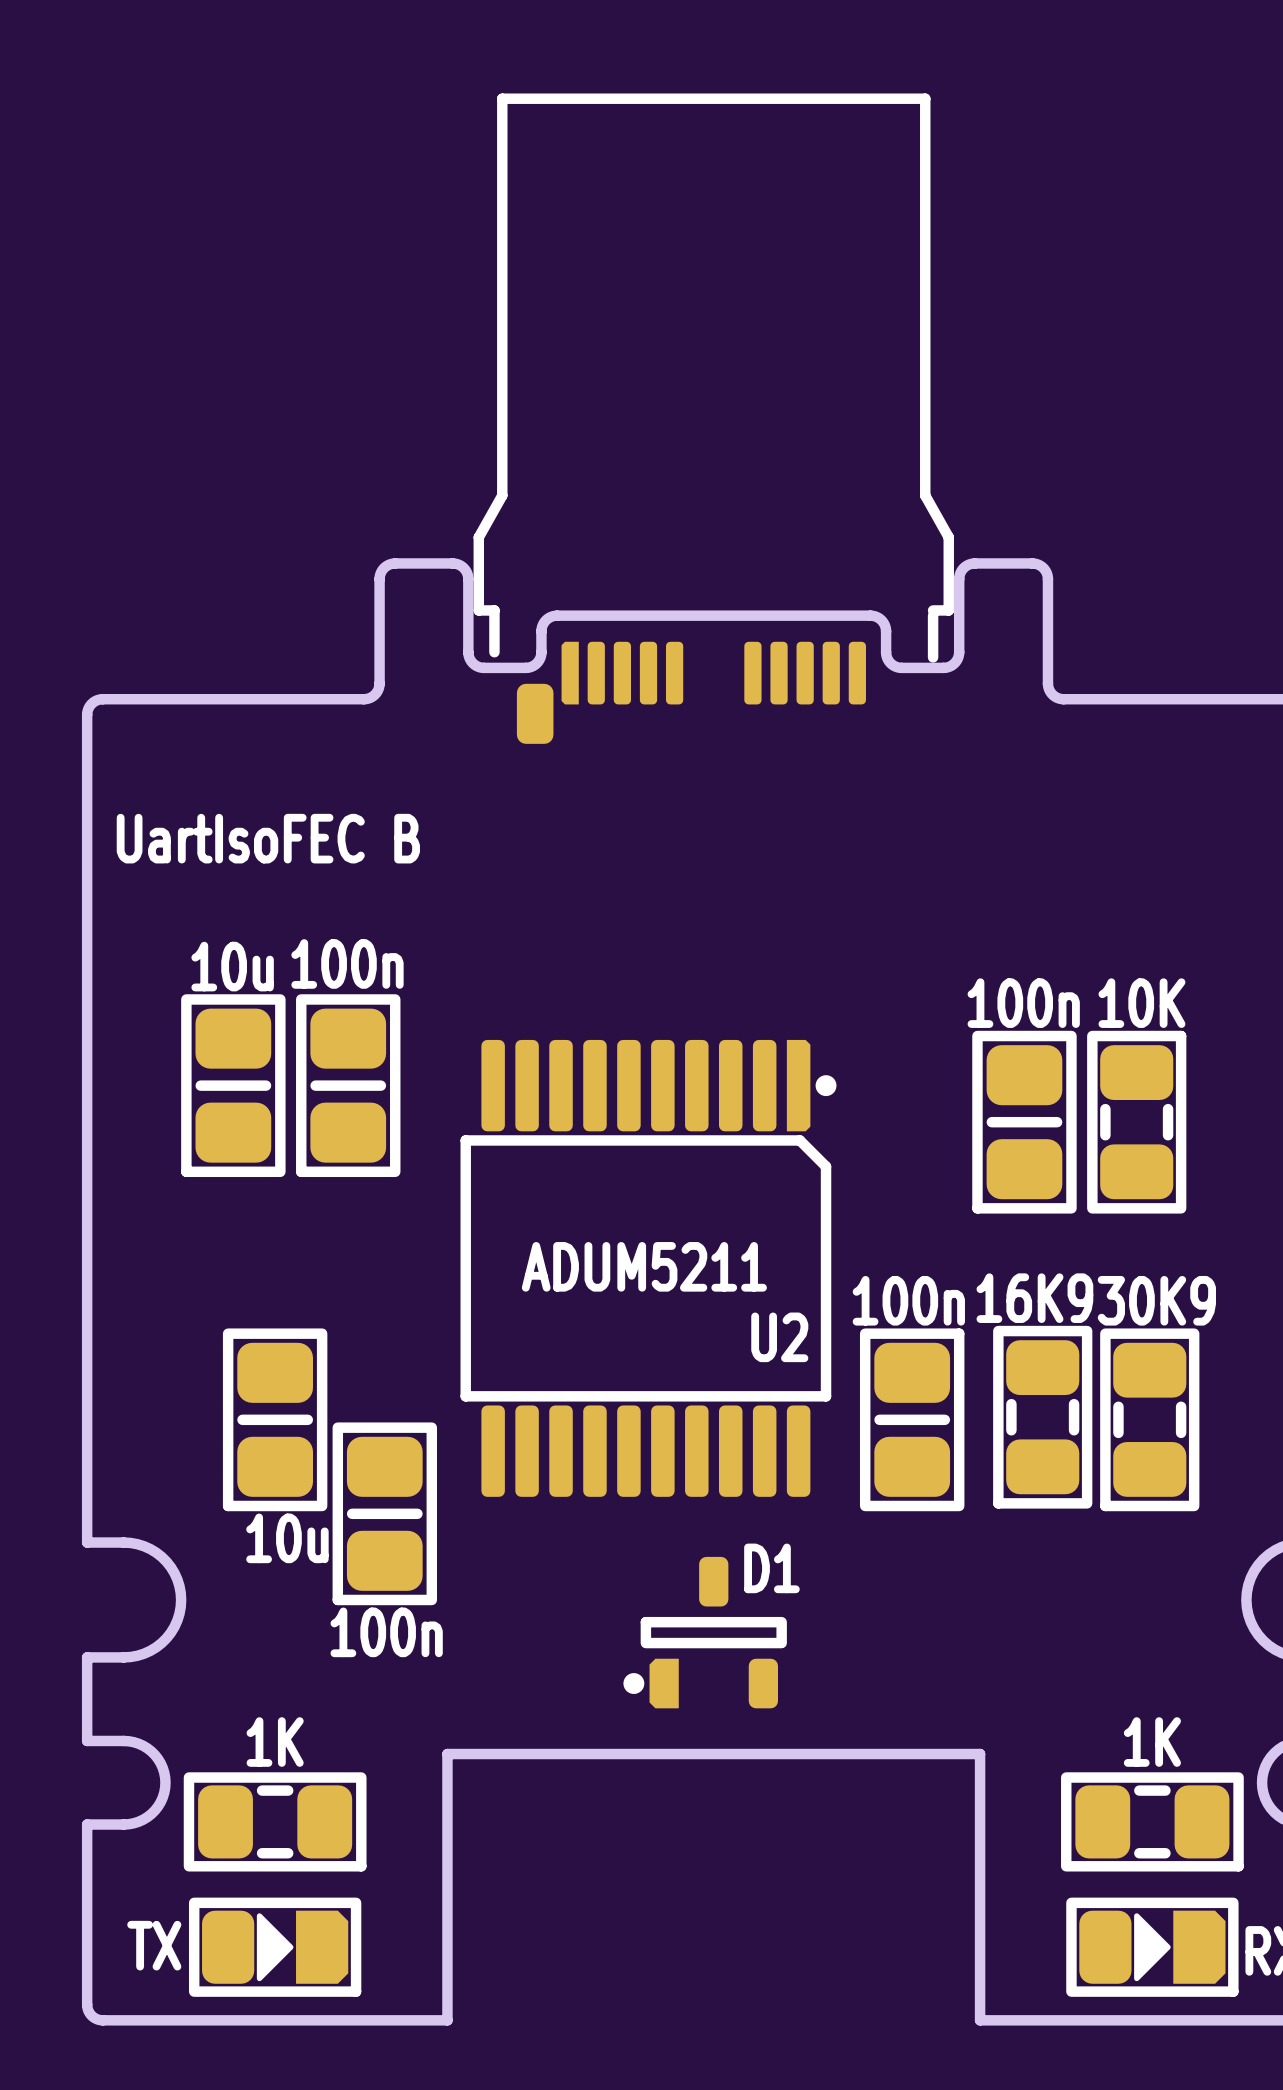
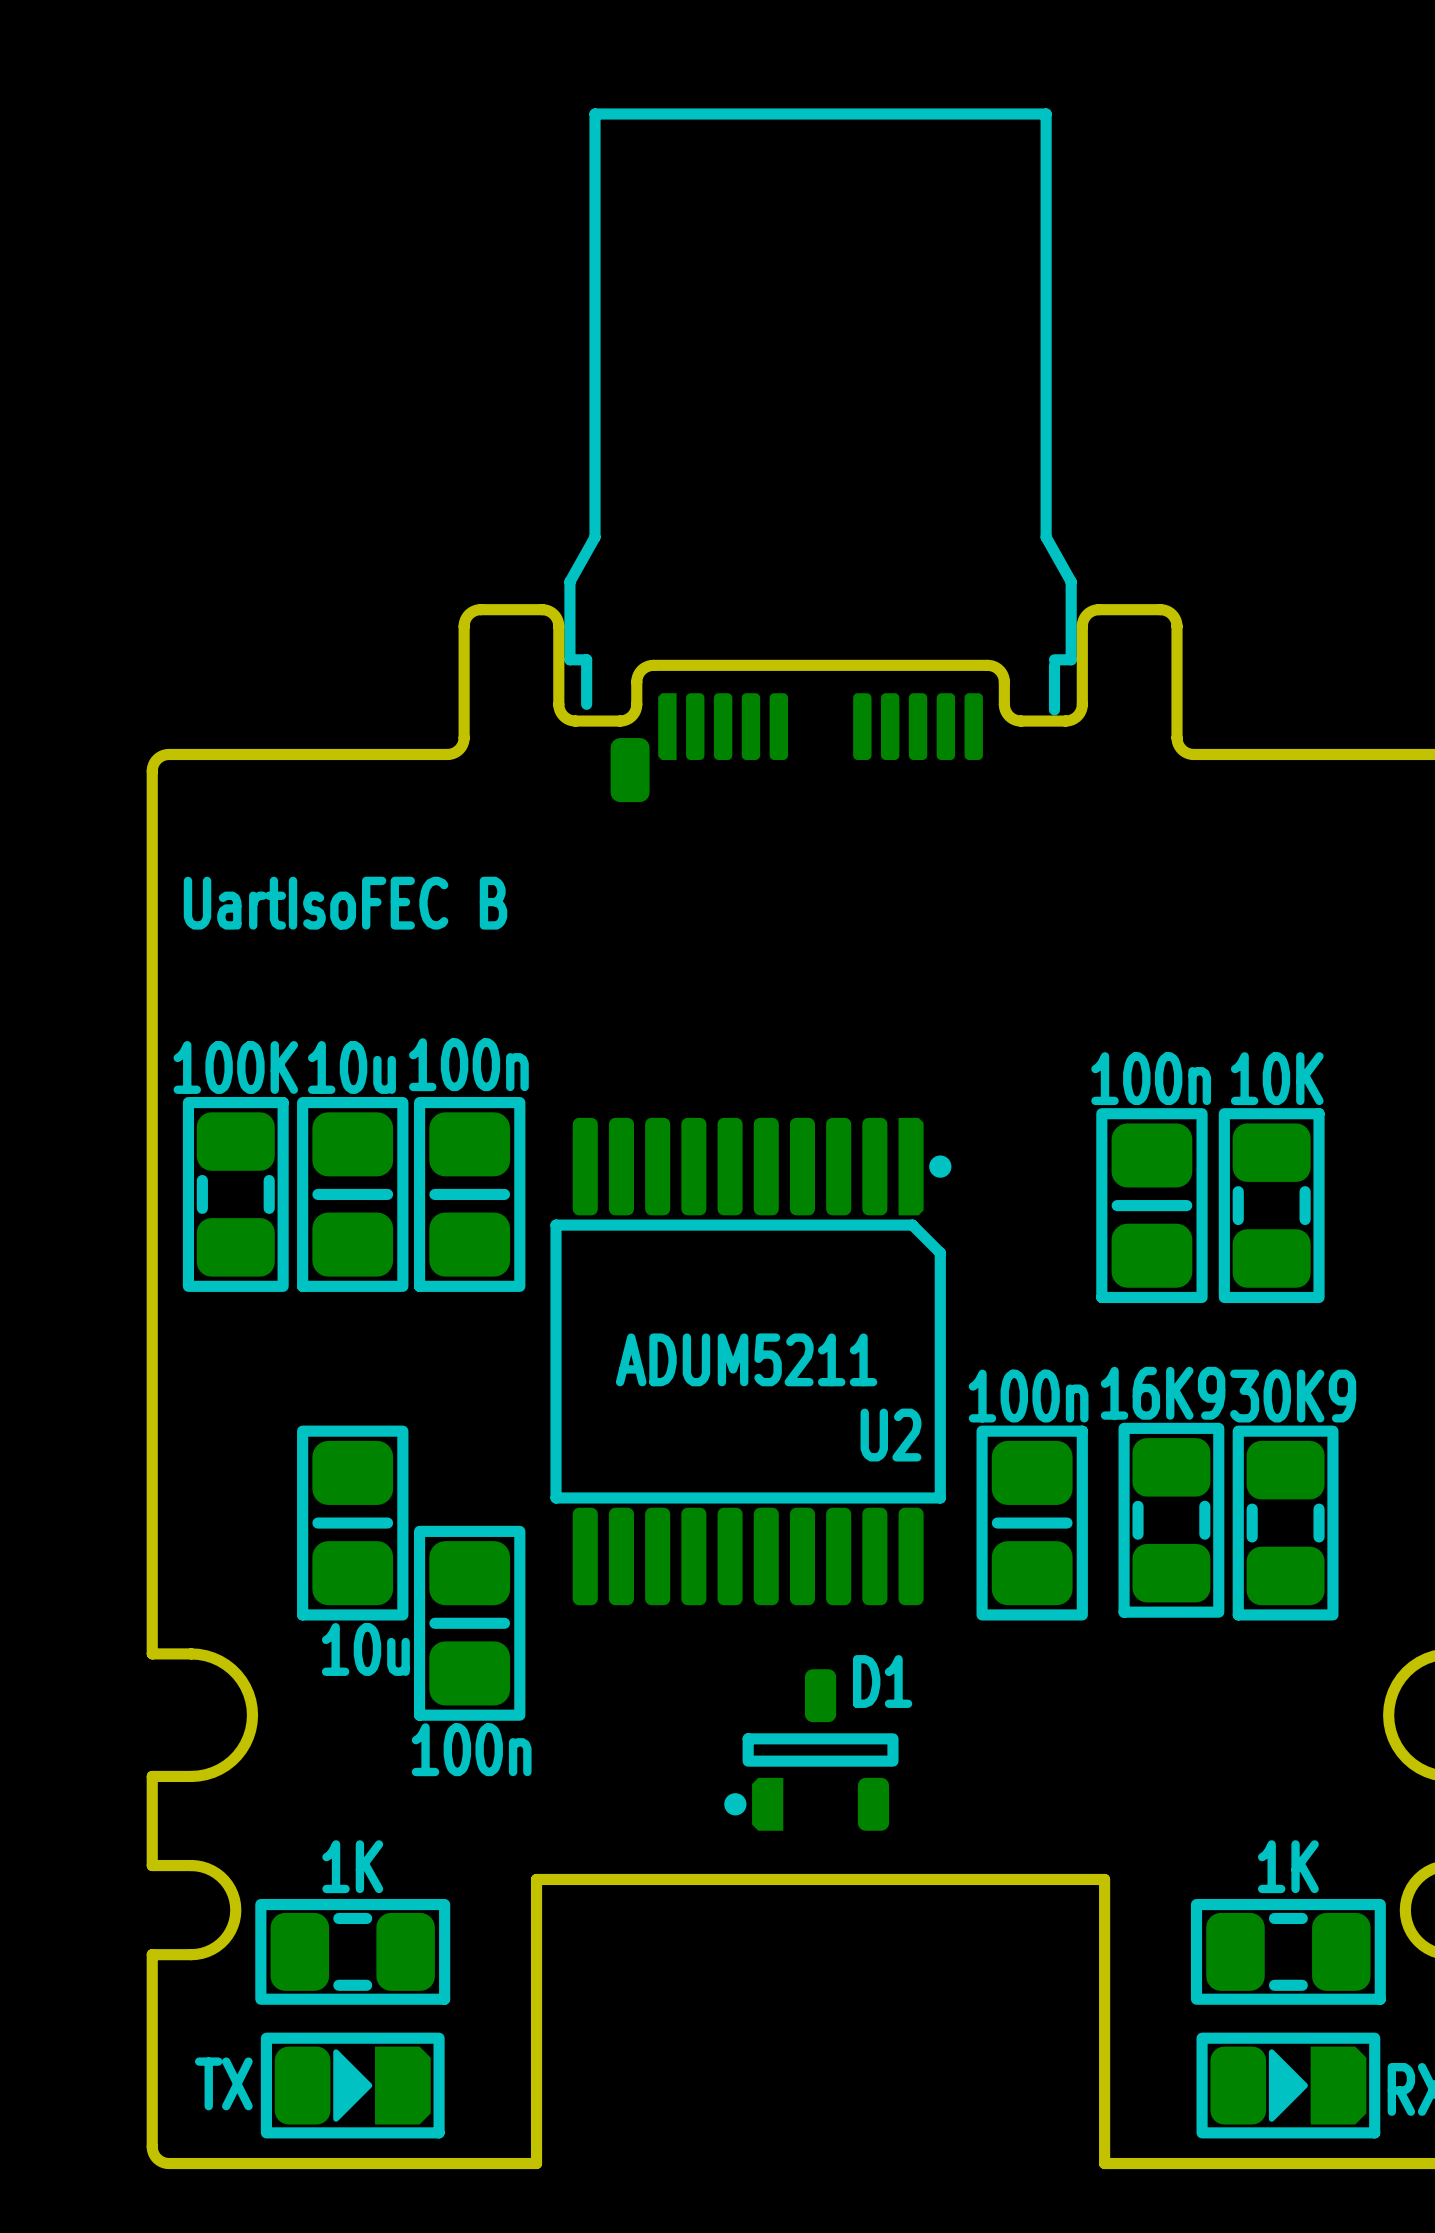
part position: (233, 1085) -> (352, 1194)
part position: (348, 1085) -> (469, 1194)
part: none -> 100K (235, 1194)

